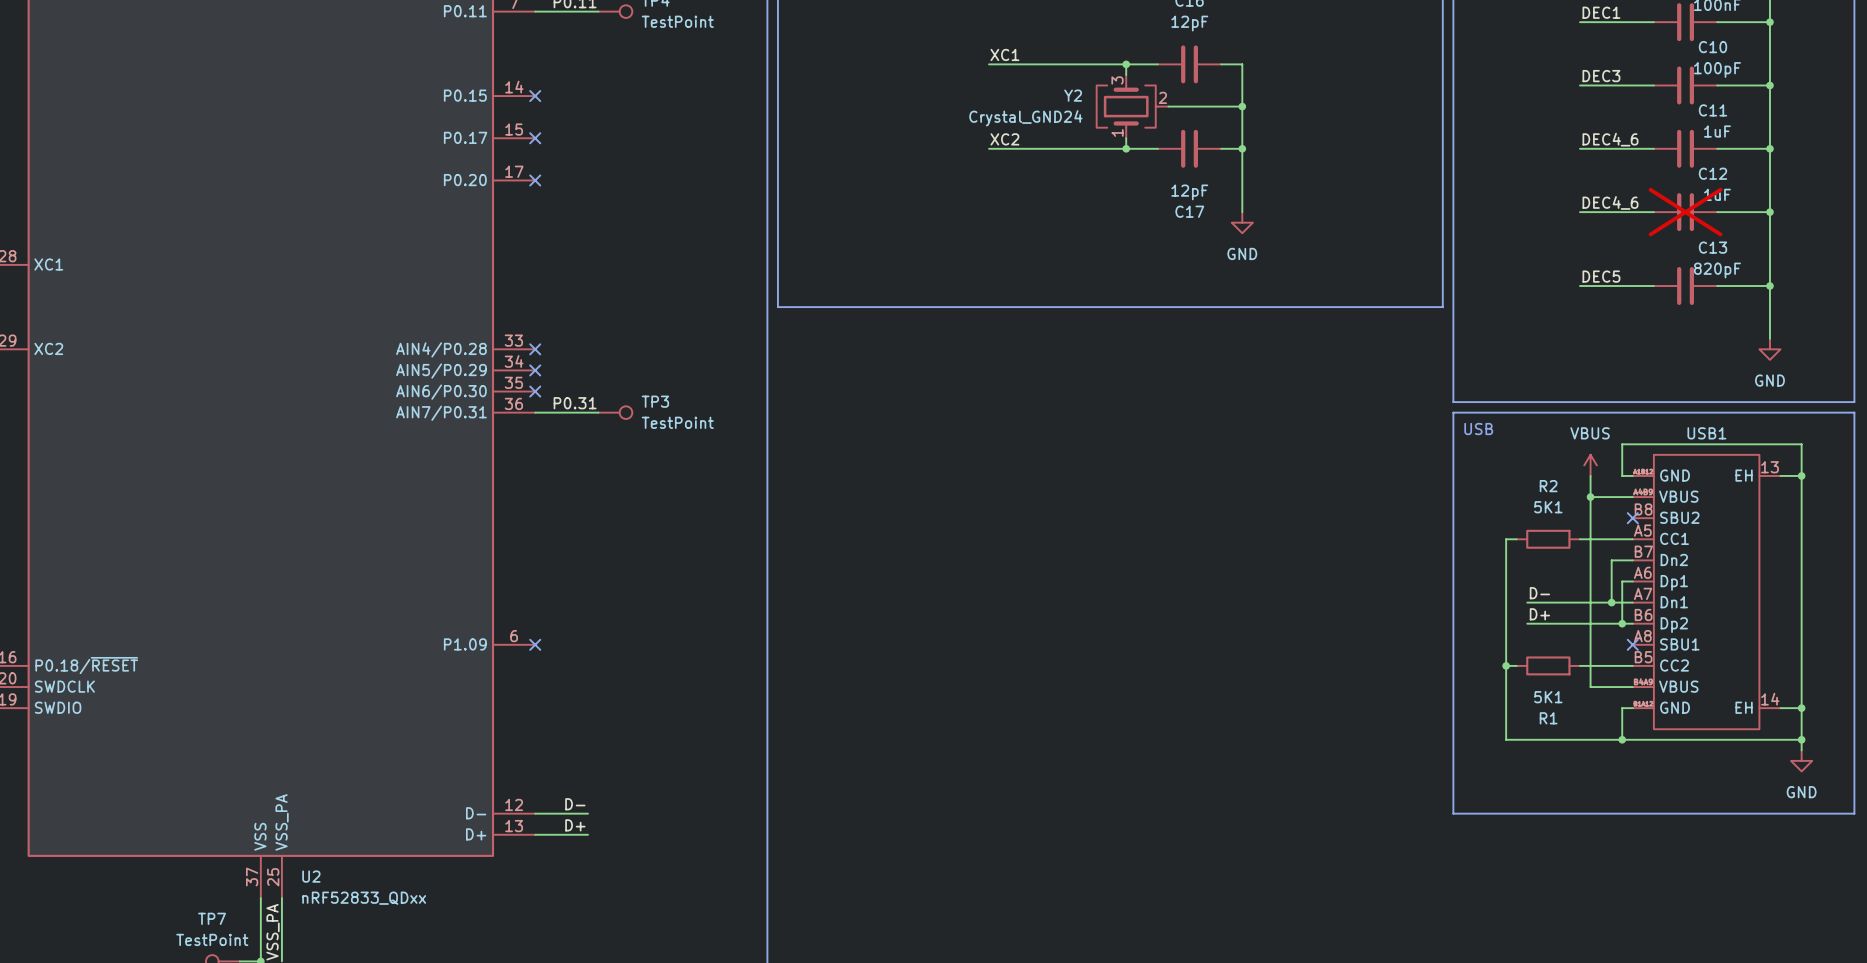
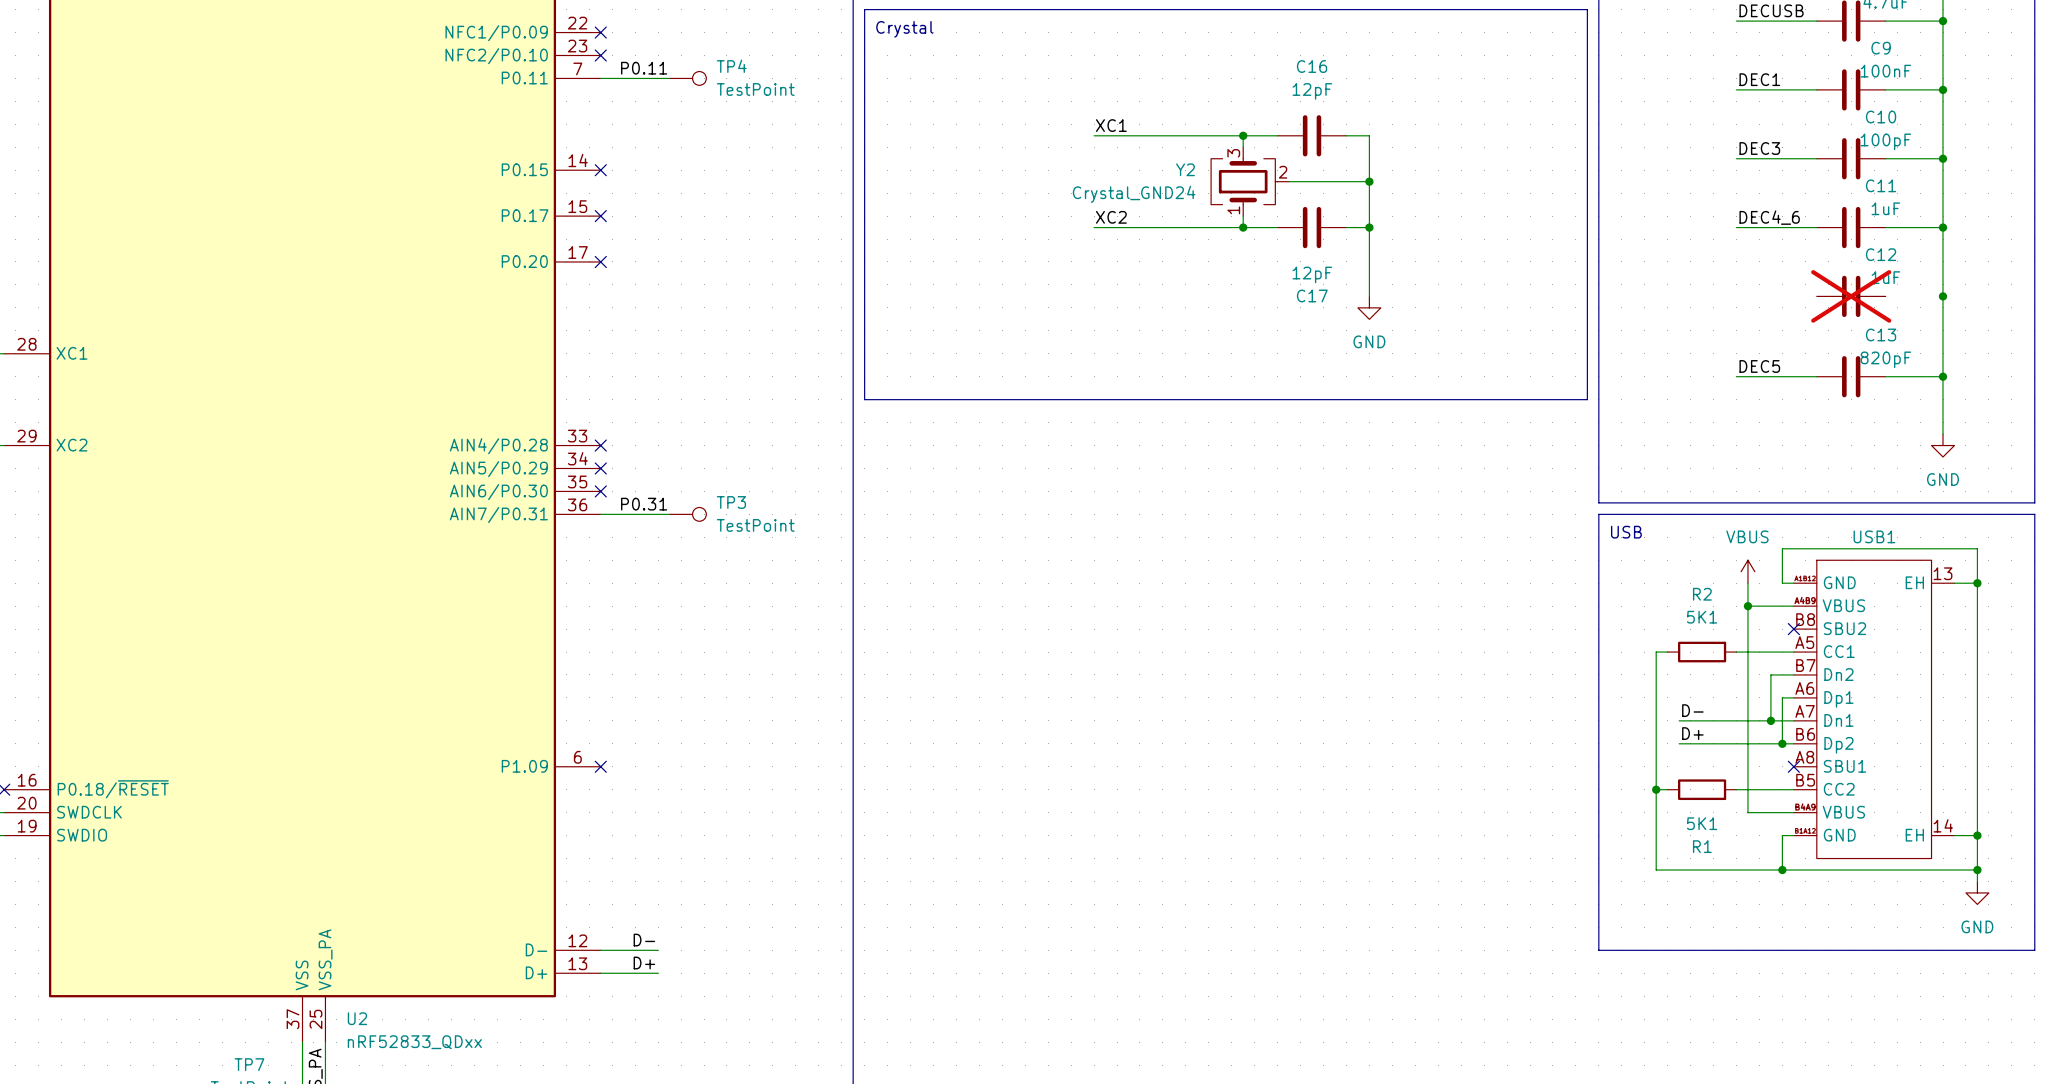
label: DEC4_6 (1610, 202) -> none
wire: (1580, 212) (1653, 212) -> none
wire: (1717, 212) (1769, 212) -> none

